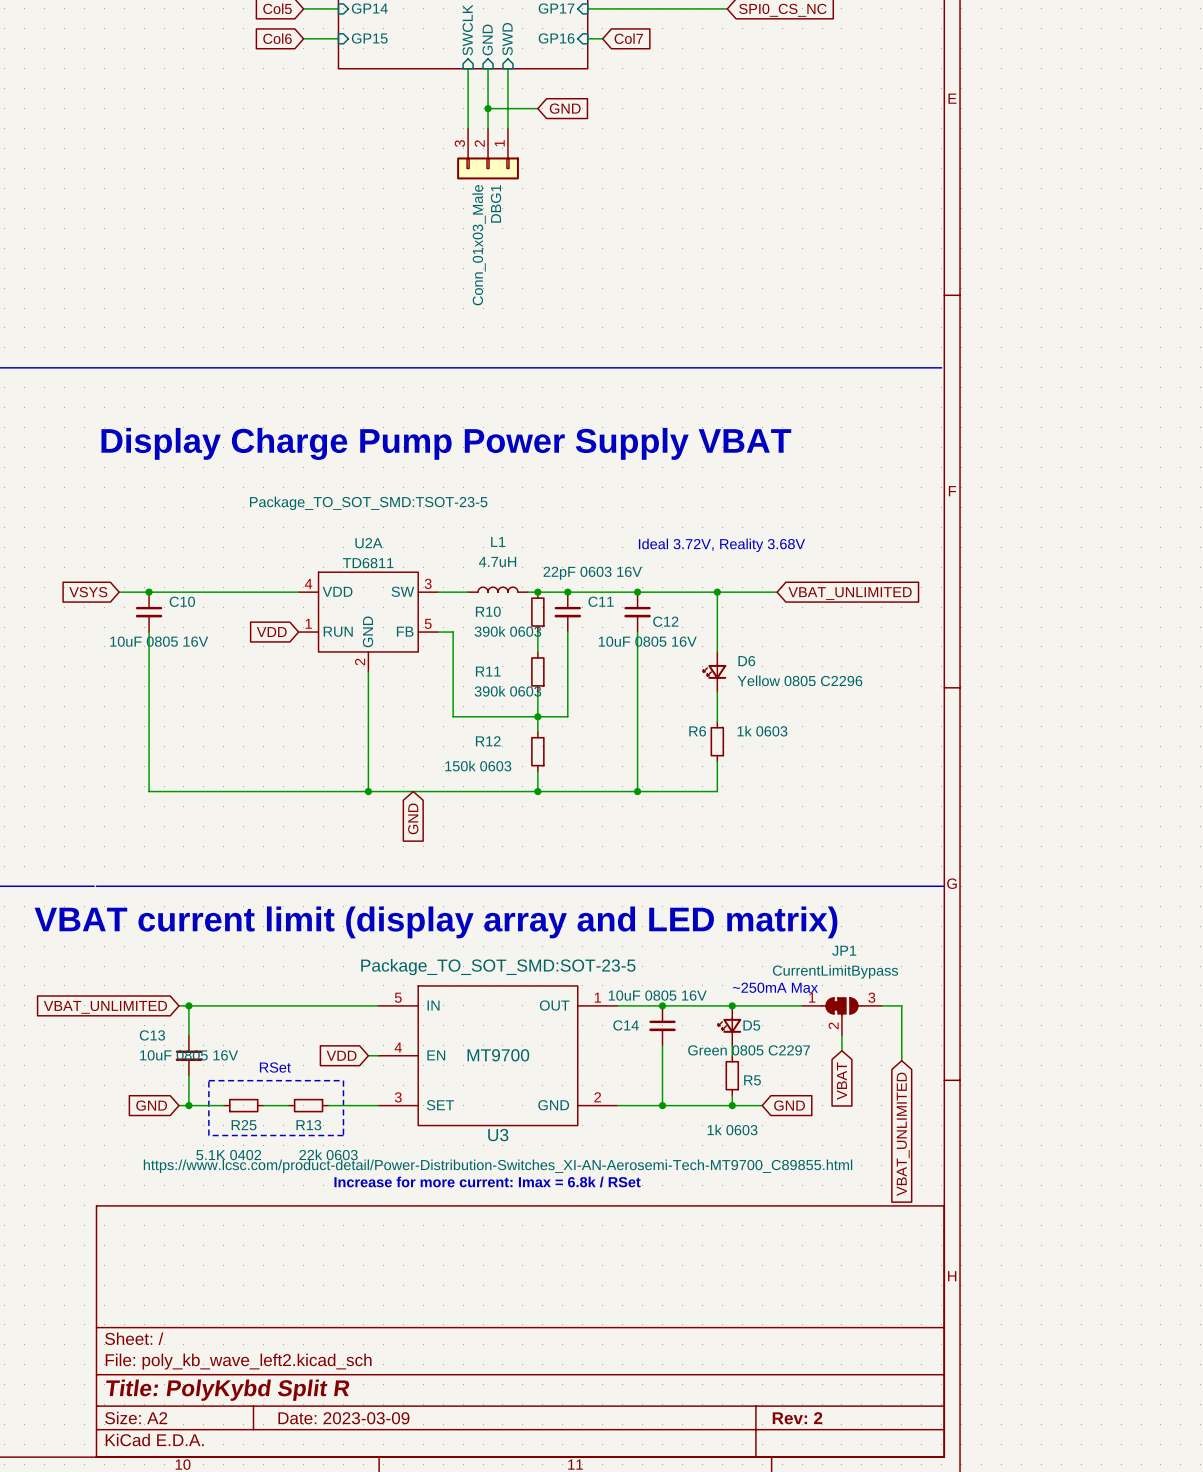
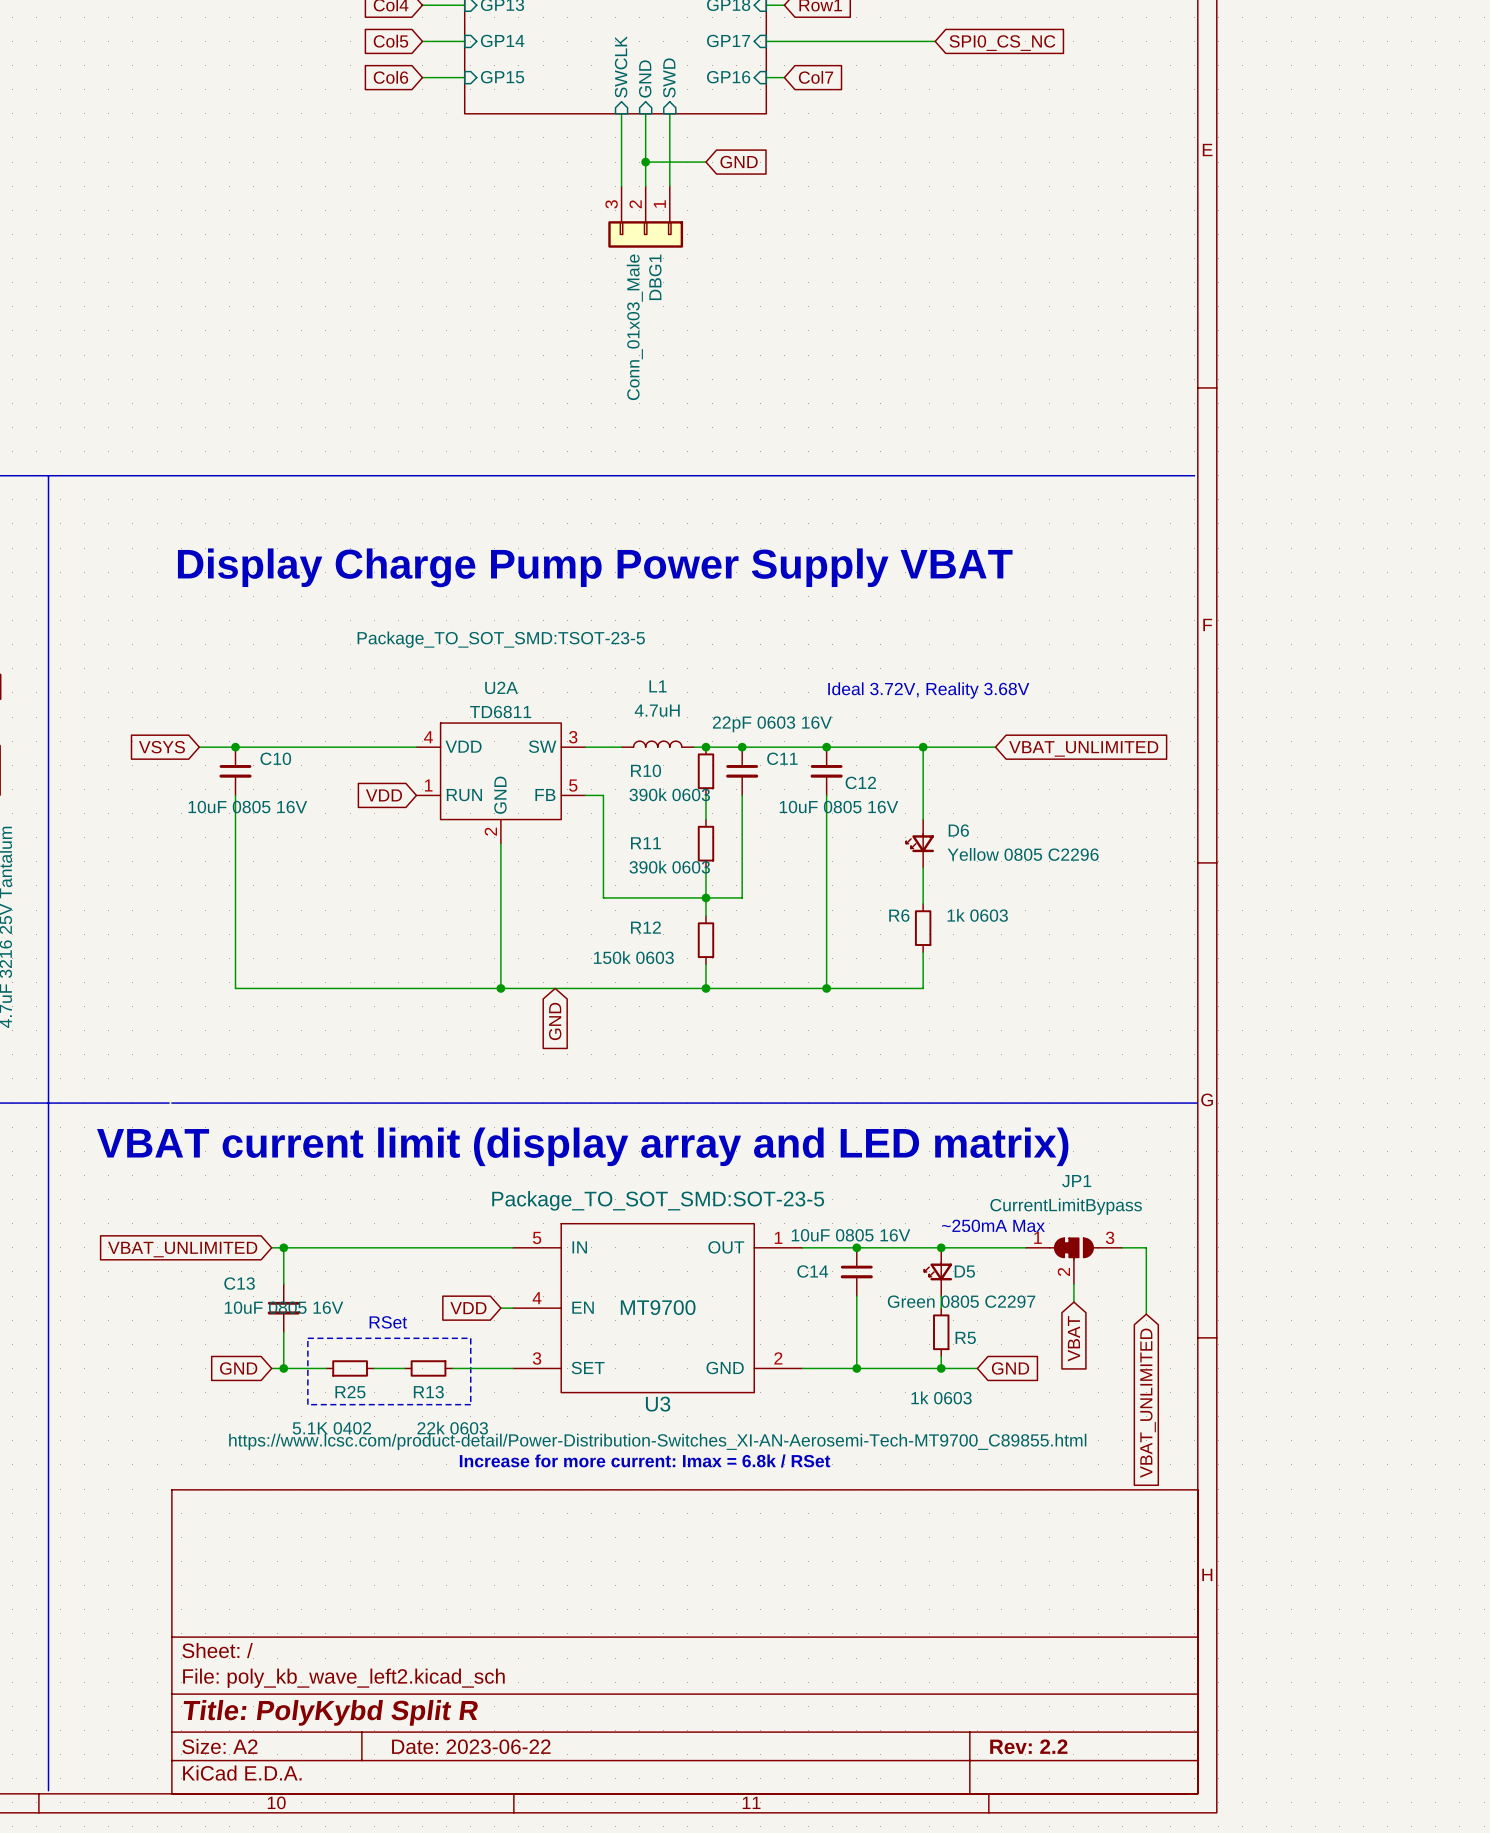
title block: Date: 2023-03-09 (343, 1418) -> Date: 2023-06-22 (471, 1746)
title block: Rev: 2 (797, 1418) -> Rev: 2.2 (1028, 1746)

